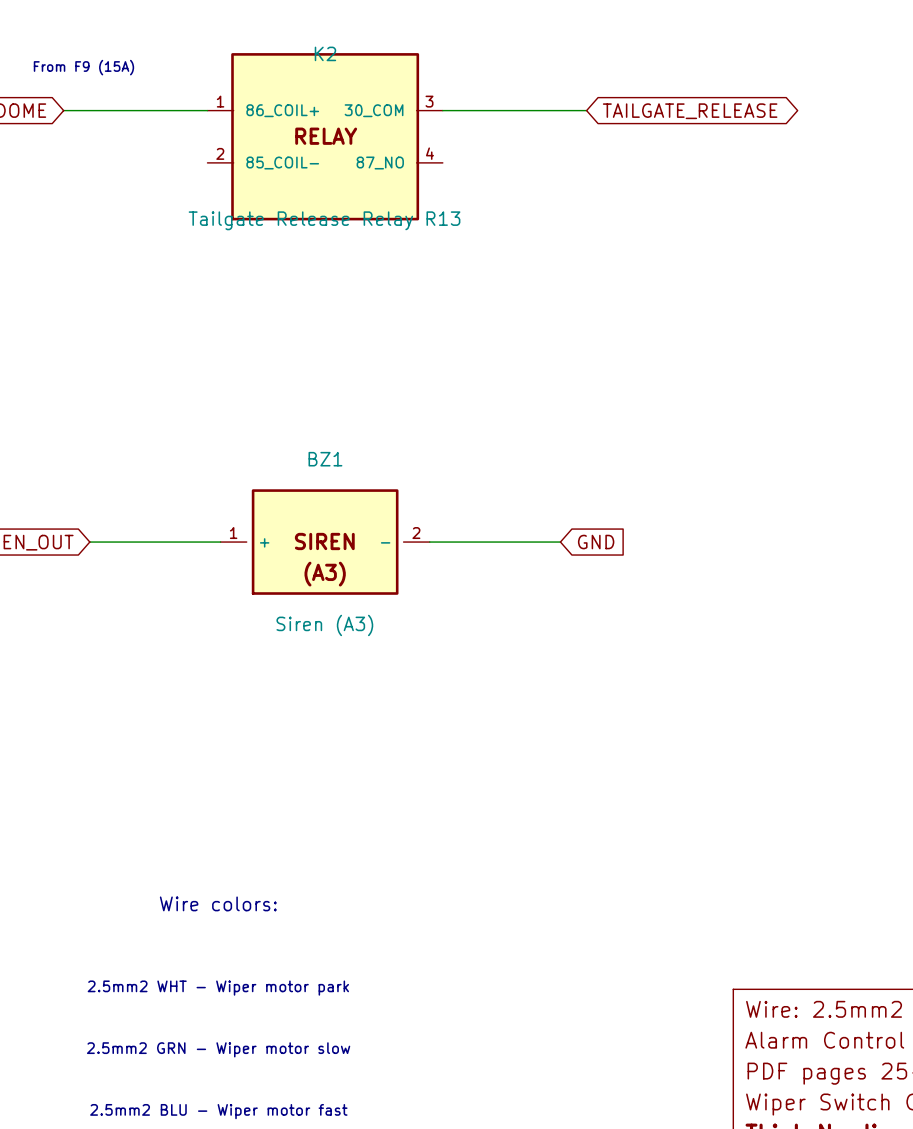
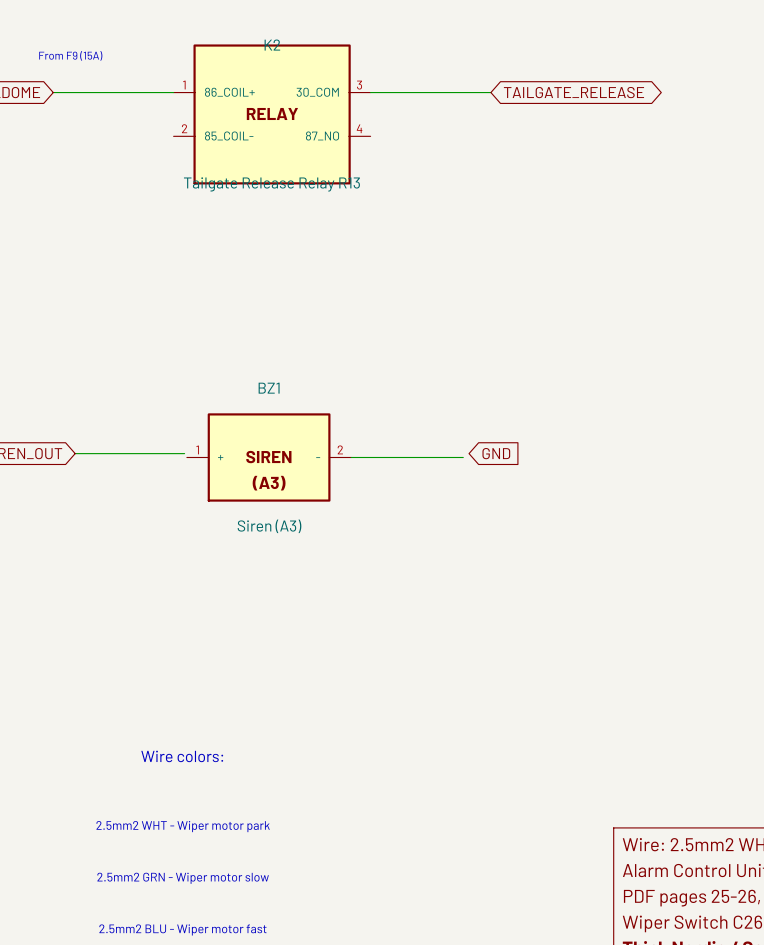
BZ1 symbol: [220, 489, 430, 595] -> [186, 413, 352, 502]
wire: (429, 542) (560, 542) -> none
wire: none -> (351, 457) (463, 457)

